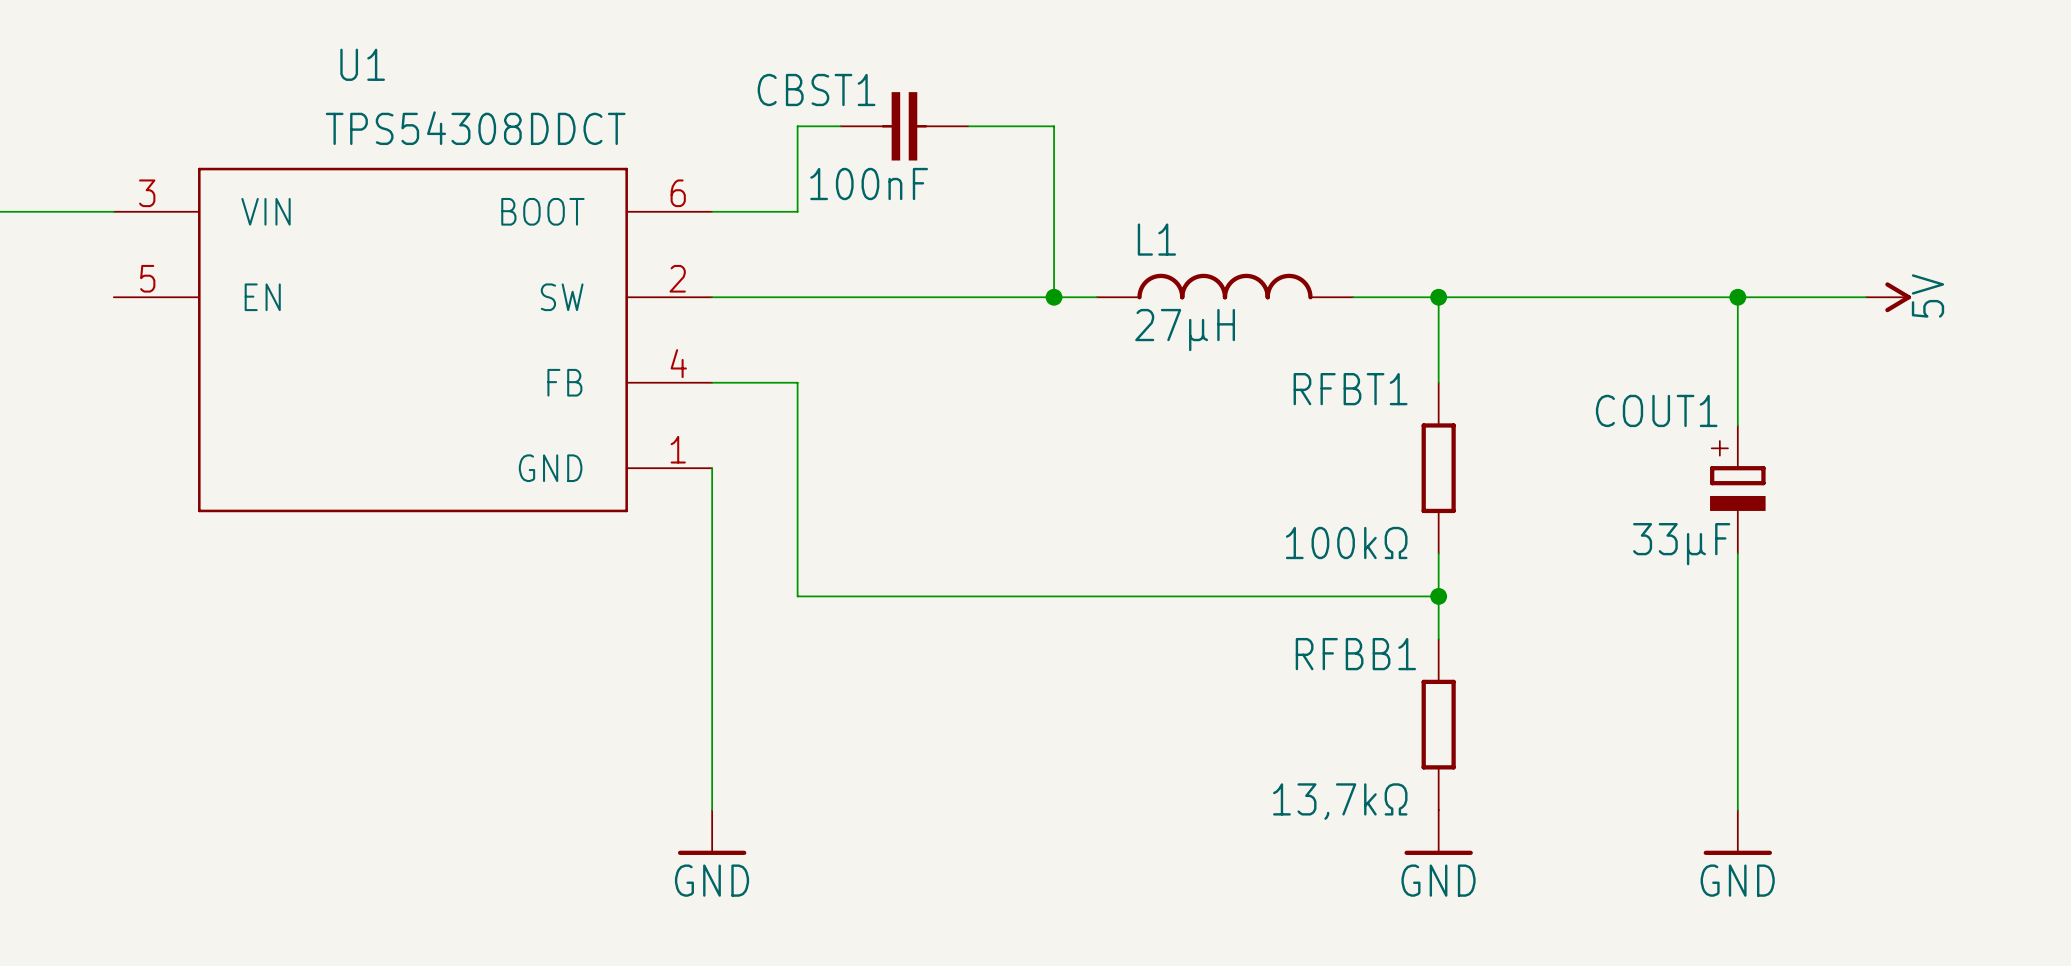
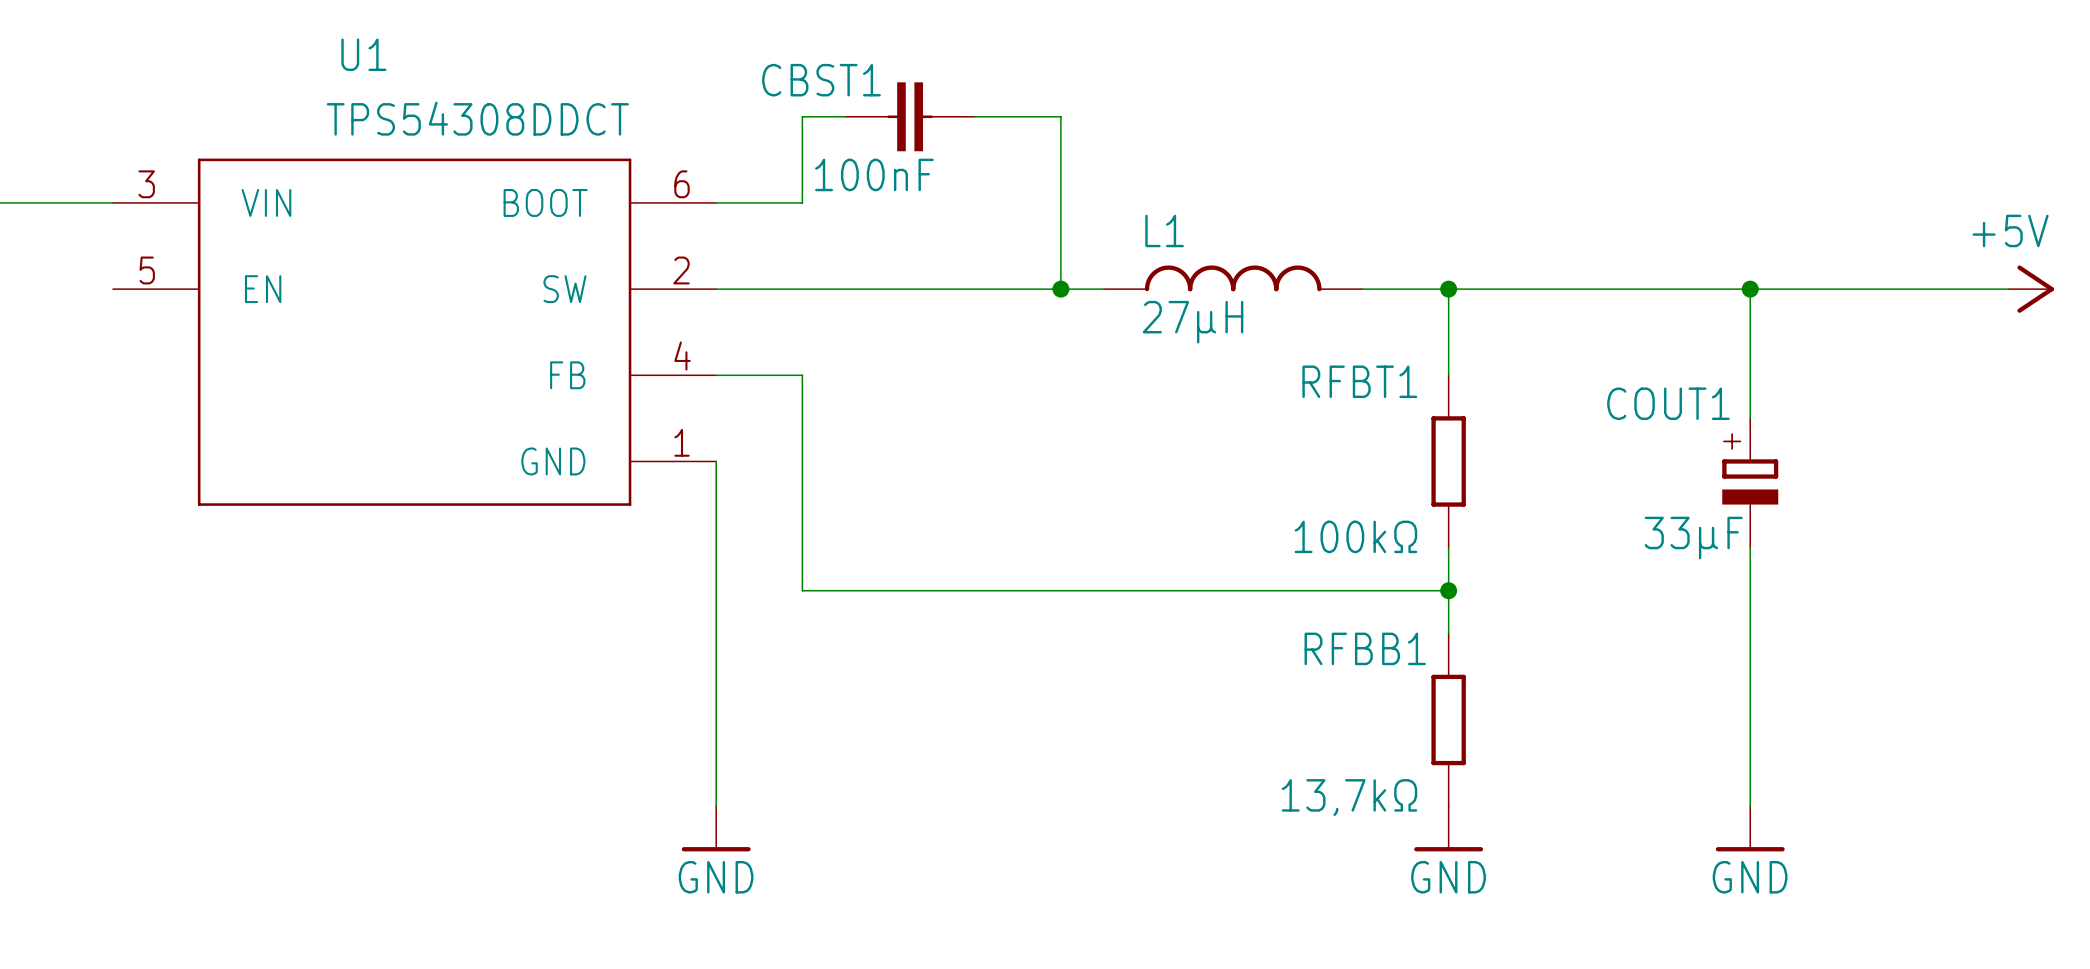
wire: none -> (1879, 289) (2008, 289)
power symbol: 5V (1888, 297) -> none
power symbol: none -> +5V (2031, 289)

